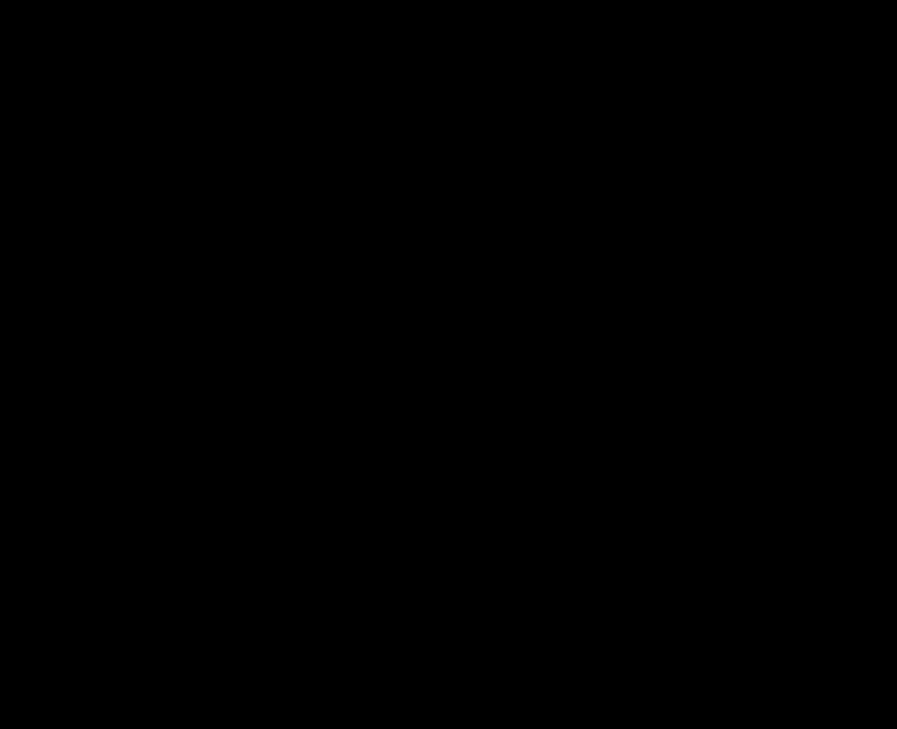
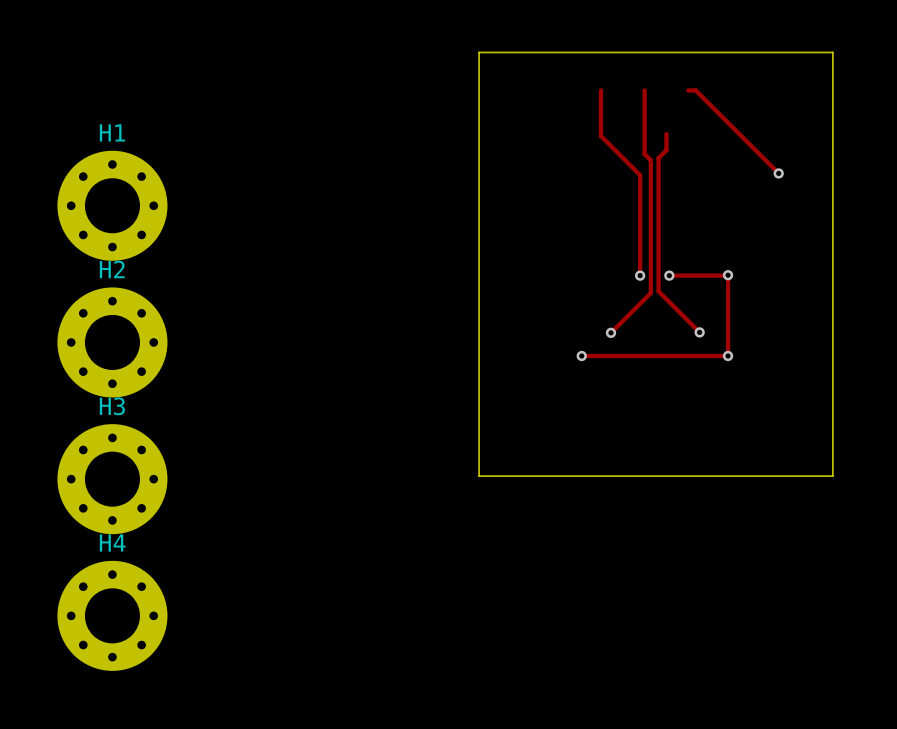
board edge: none -> (479, 52) (832, 52) (832, 476) (479, 476) (479, 52)
track: none -> (600, 90) (600, 136) (640, 175) (640, 275)
track: none -> (644, 90) (644, 154) (650, 160) (650, 292) (610, 332)
track: none -> (688, 90) (695, 90) (778, 173)
track: none -> (666, 134) (666, 150) (658, 158) (658, 291) (699, 332)
via: none -> (778, 173)
H1: none -> (112, 205)
via: none -> (640, 275)
track: none -> (669, 275) (728, 275) (728, 356) (581, 356)
via: none -> (669, 275)
via: none -> (728, 275)
via: none -> (610, 332)
via: none -> (699, 332)
H2: none -> (112, 342)
via: none -> (581, 356)
via: none -> (728, 356)
H3: none -> (112, 479)
H4: none -> (112, 615)

